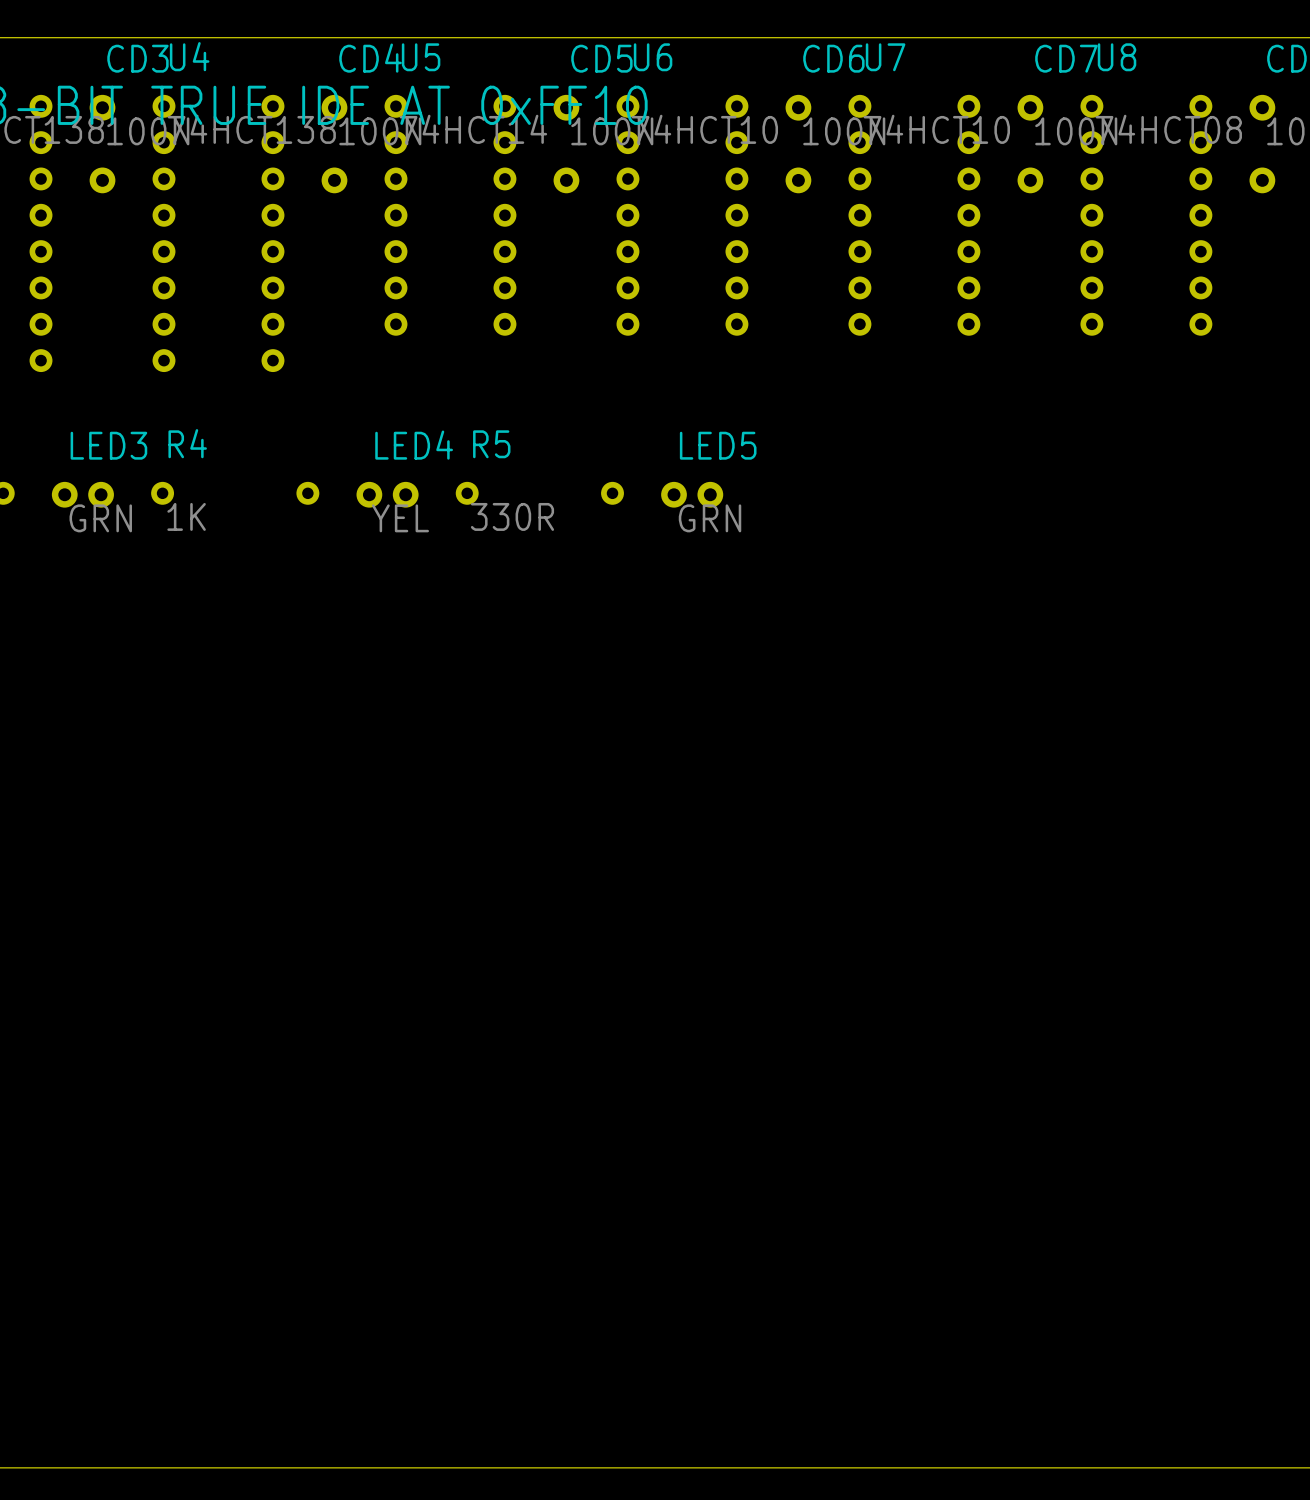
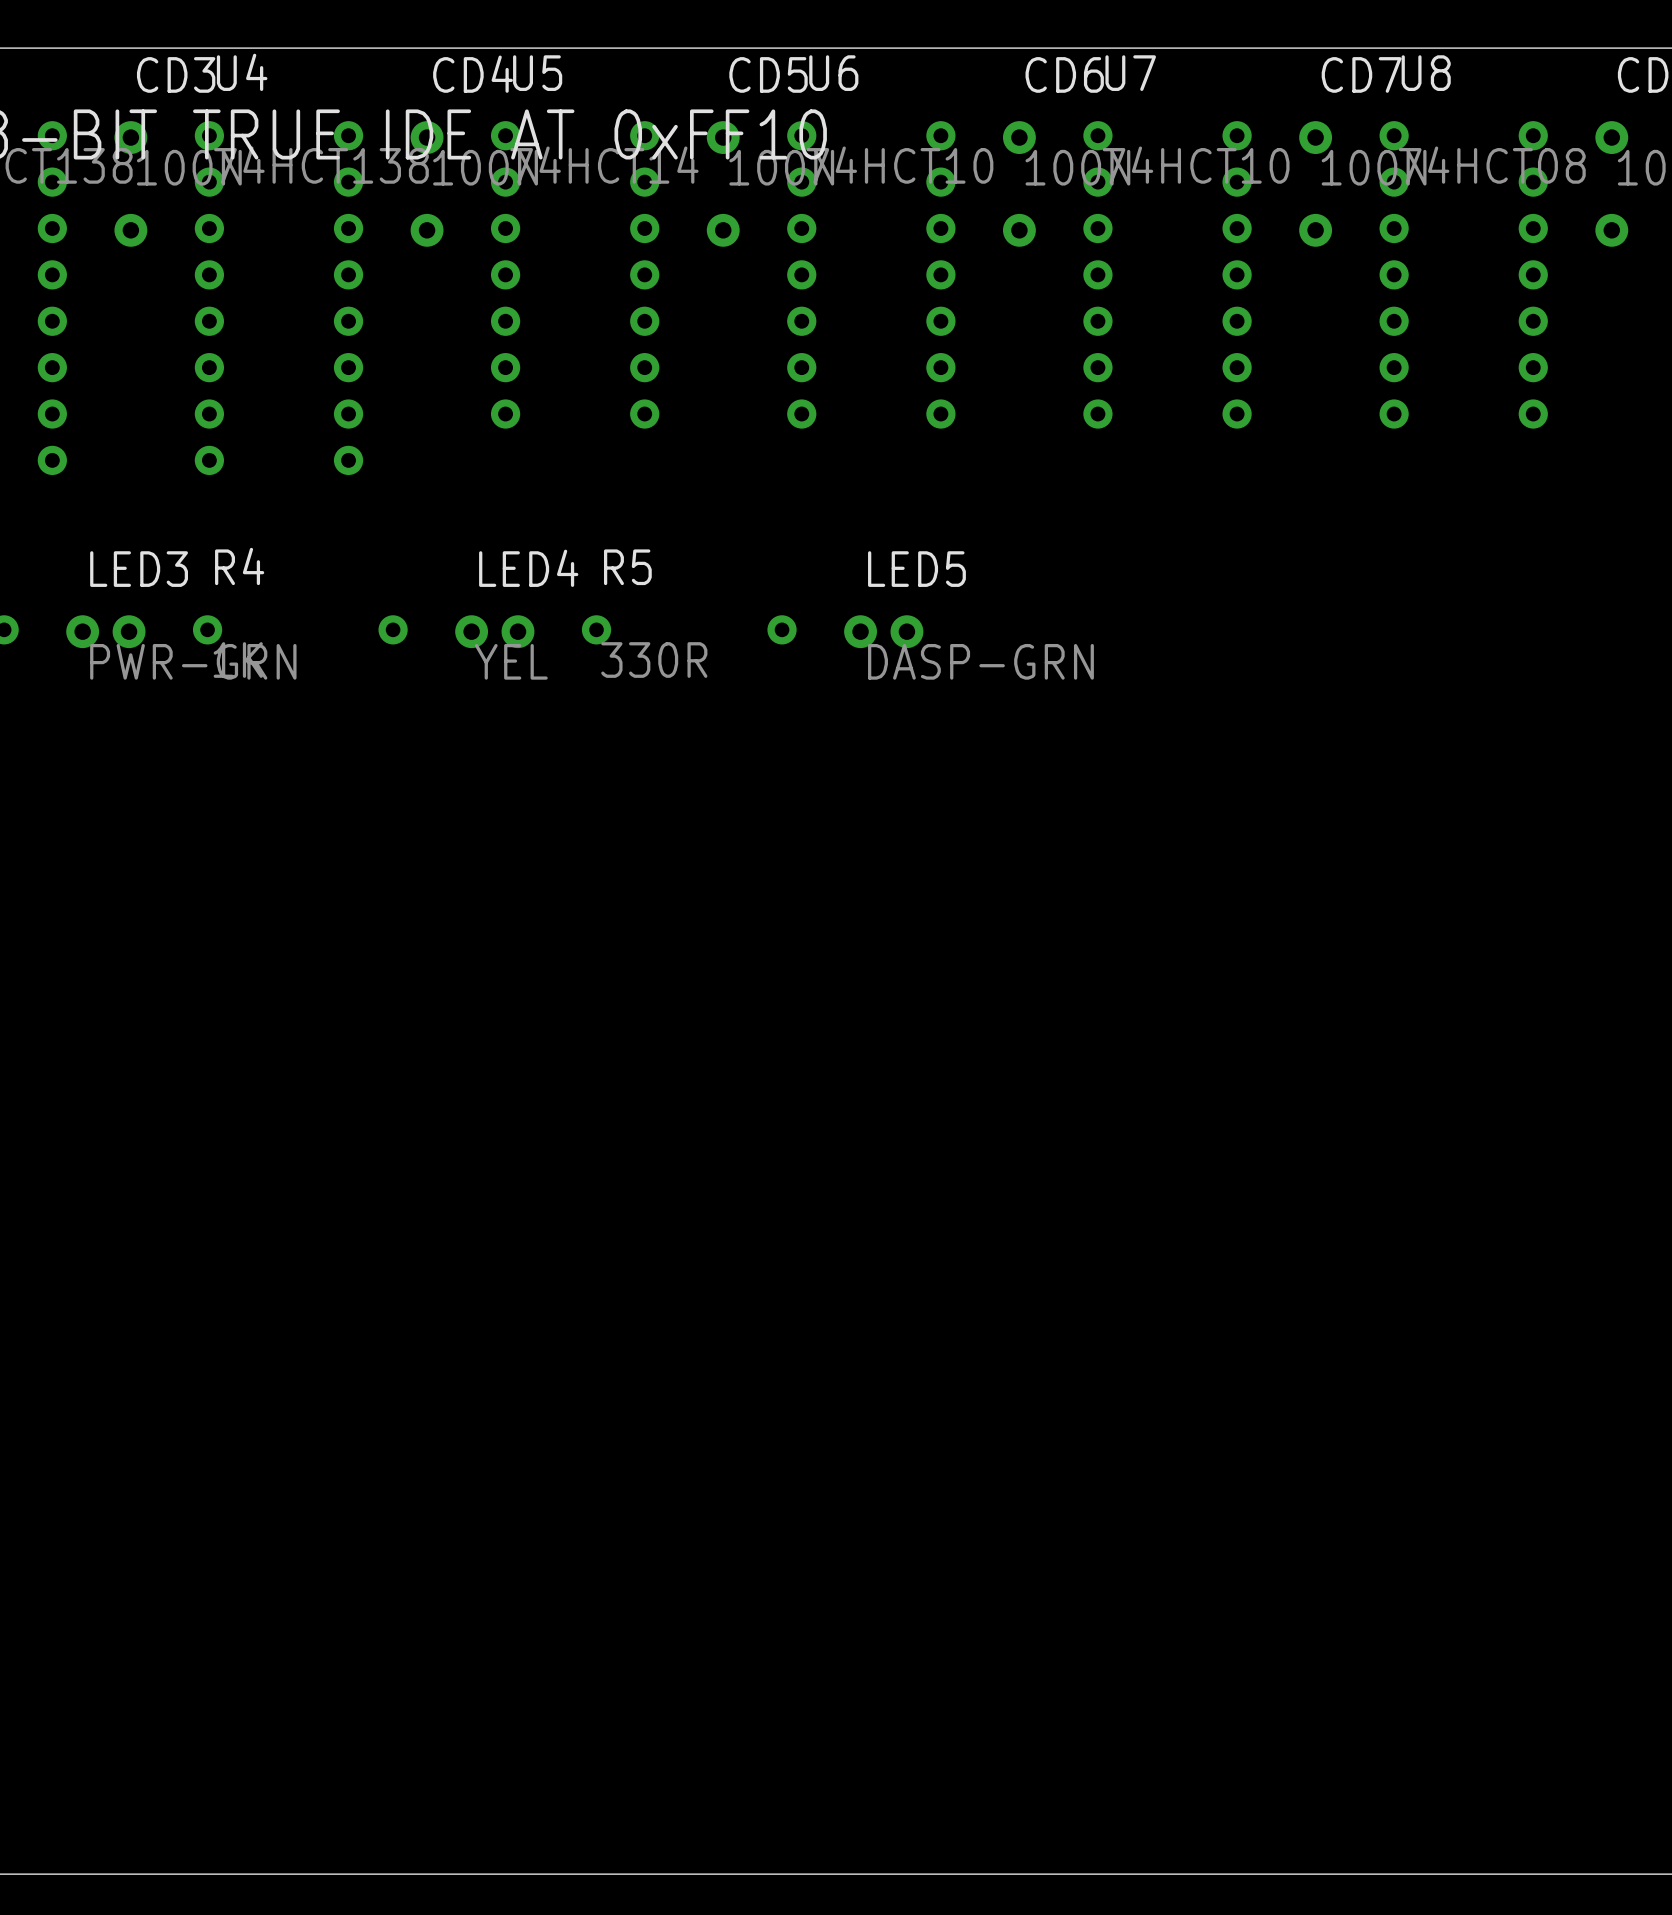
LED3 value: GRN (100, 518) -> PWR-GRN (193, 661)
LED5 value: GRN (710, 518) -> DASP-GRN (980, 661)

